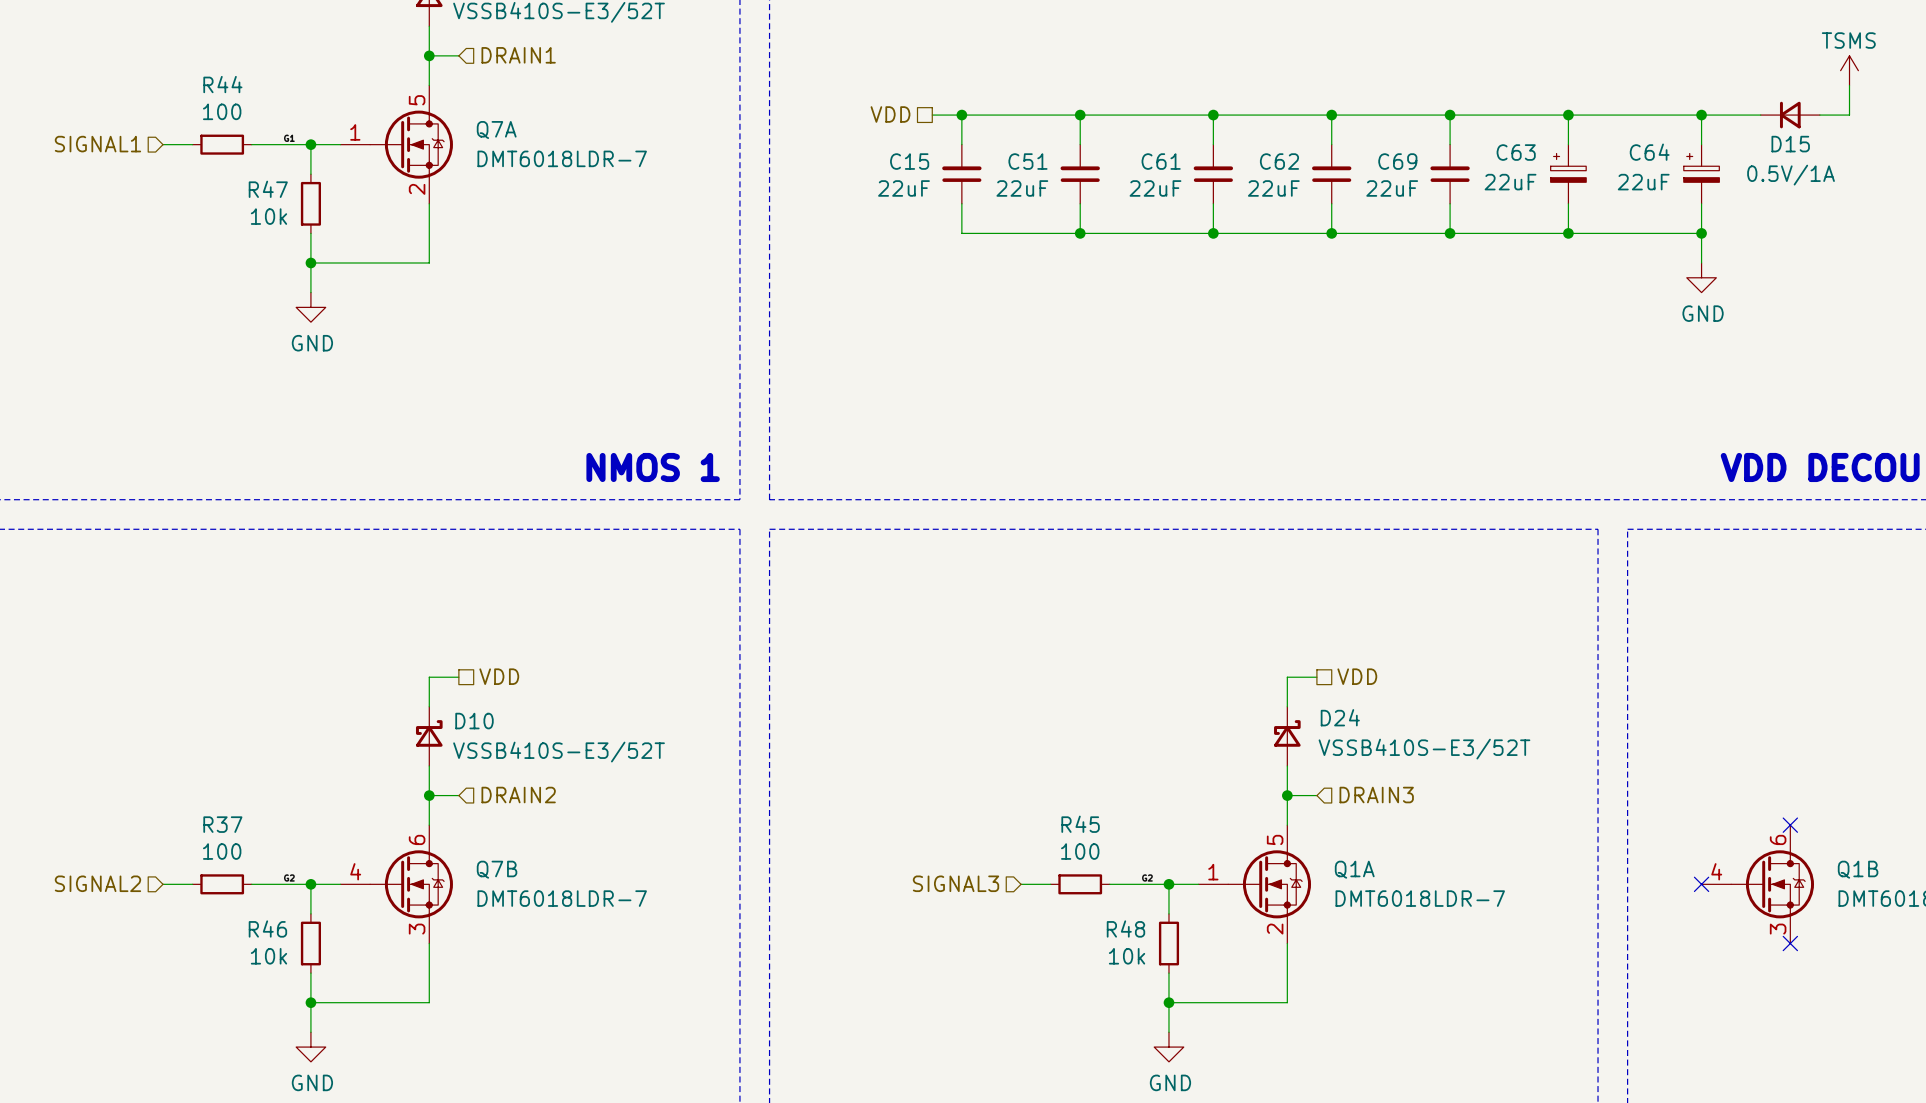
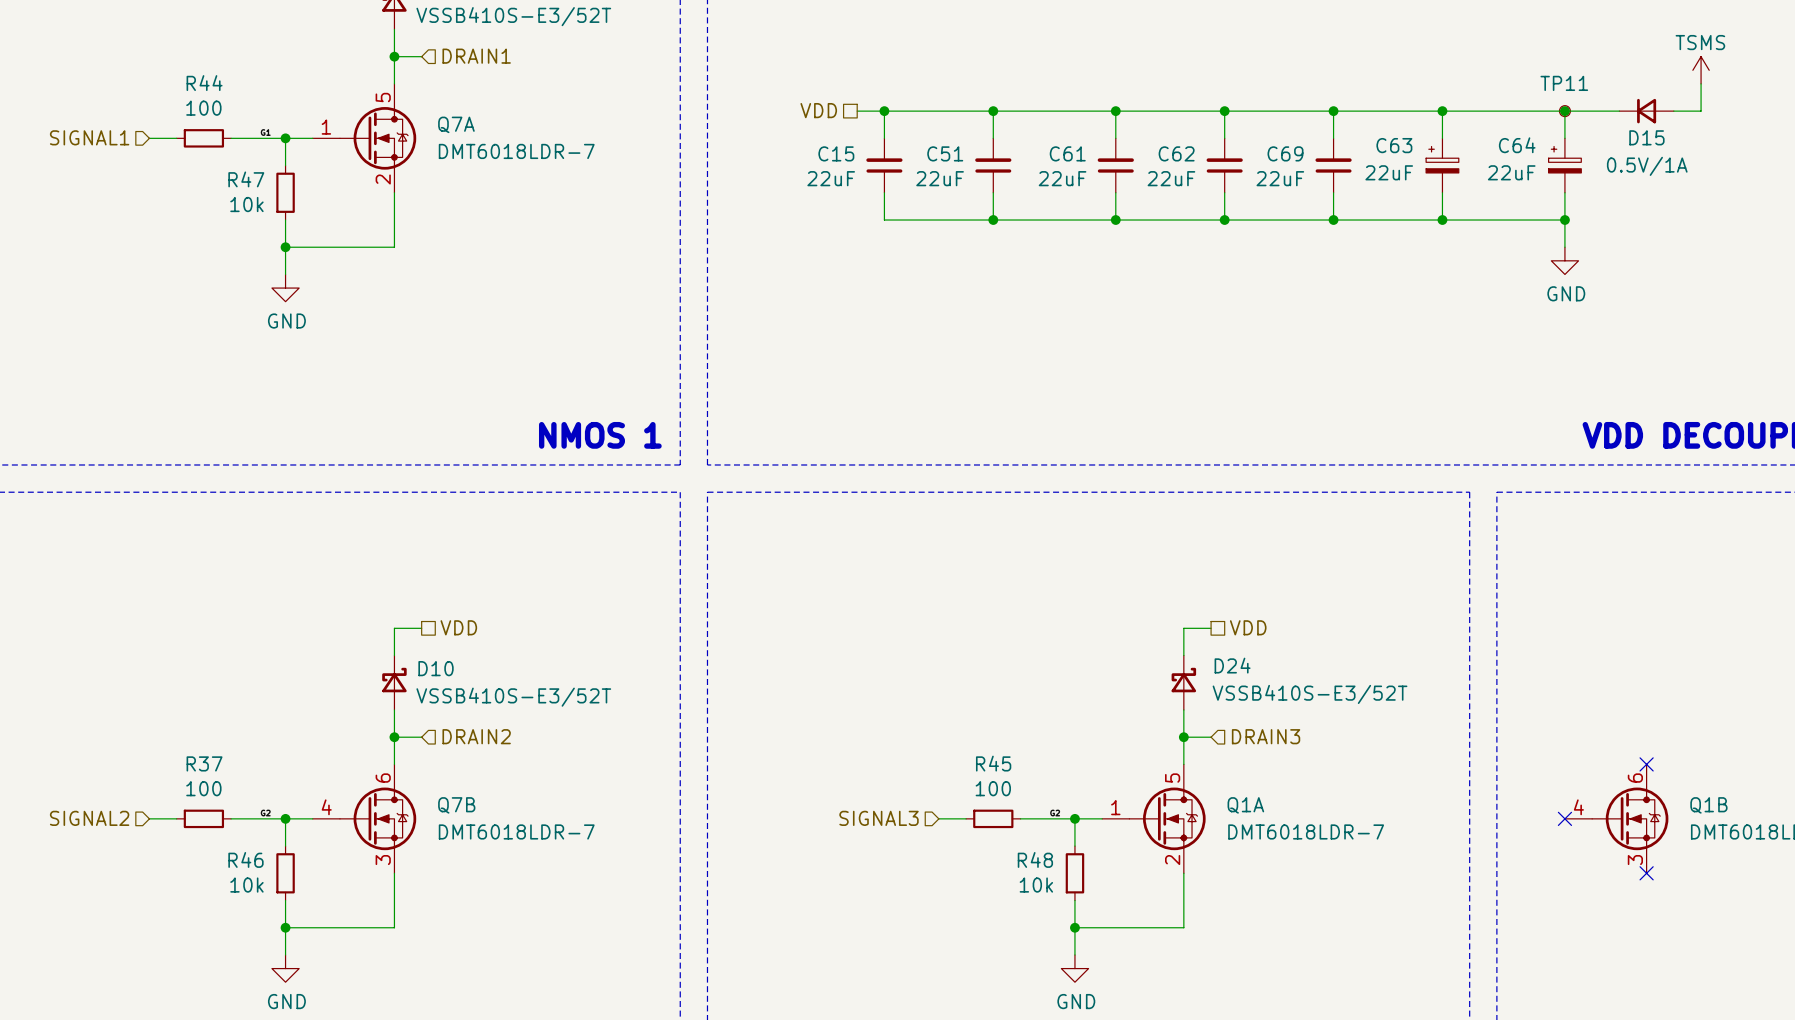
TP11: none -> (1564, 111)

